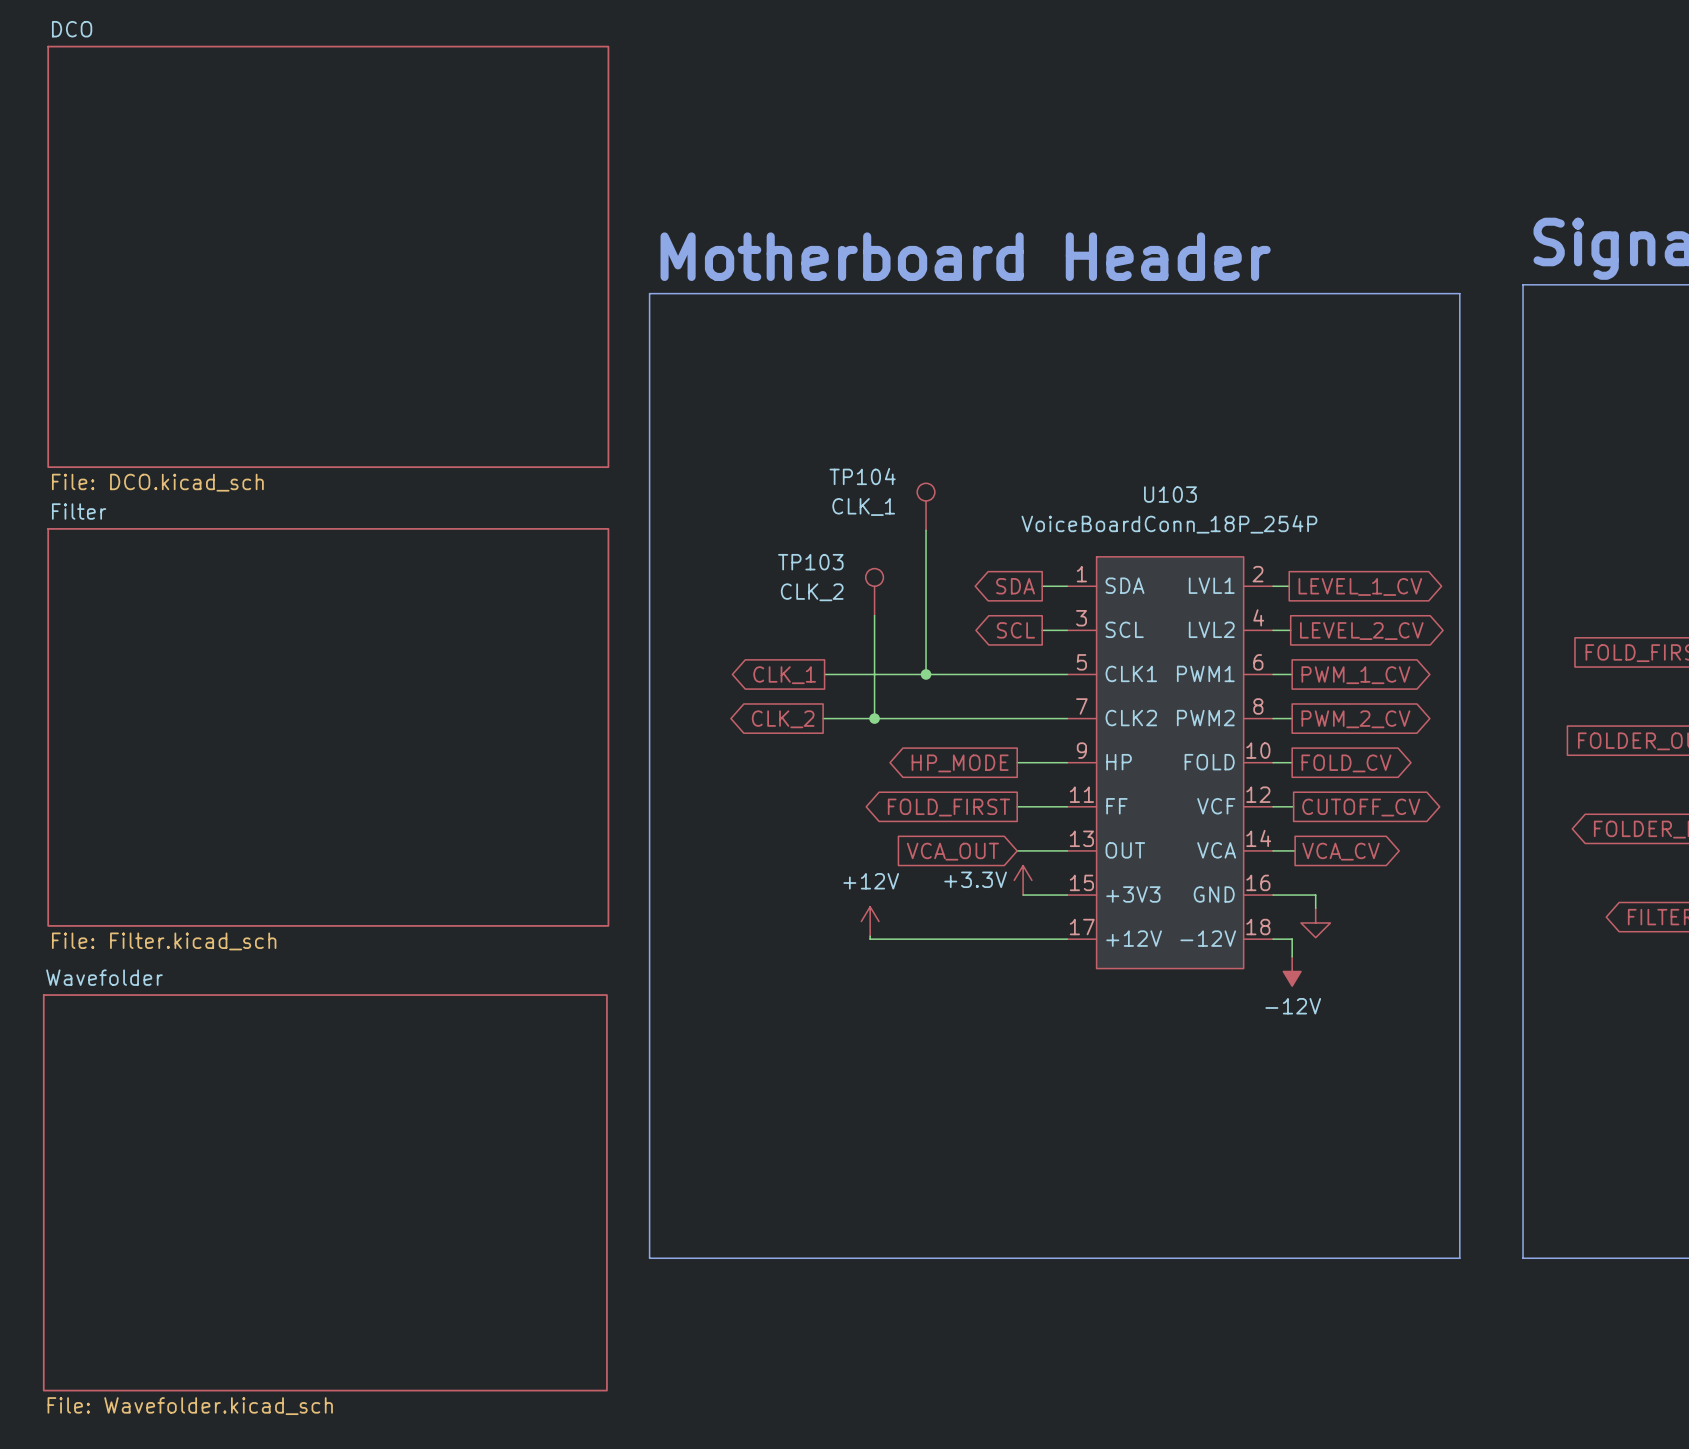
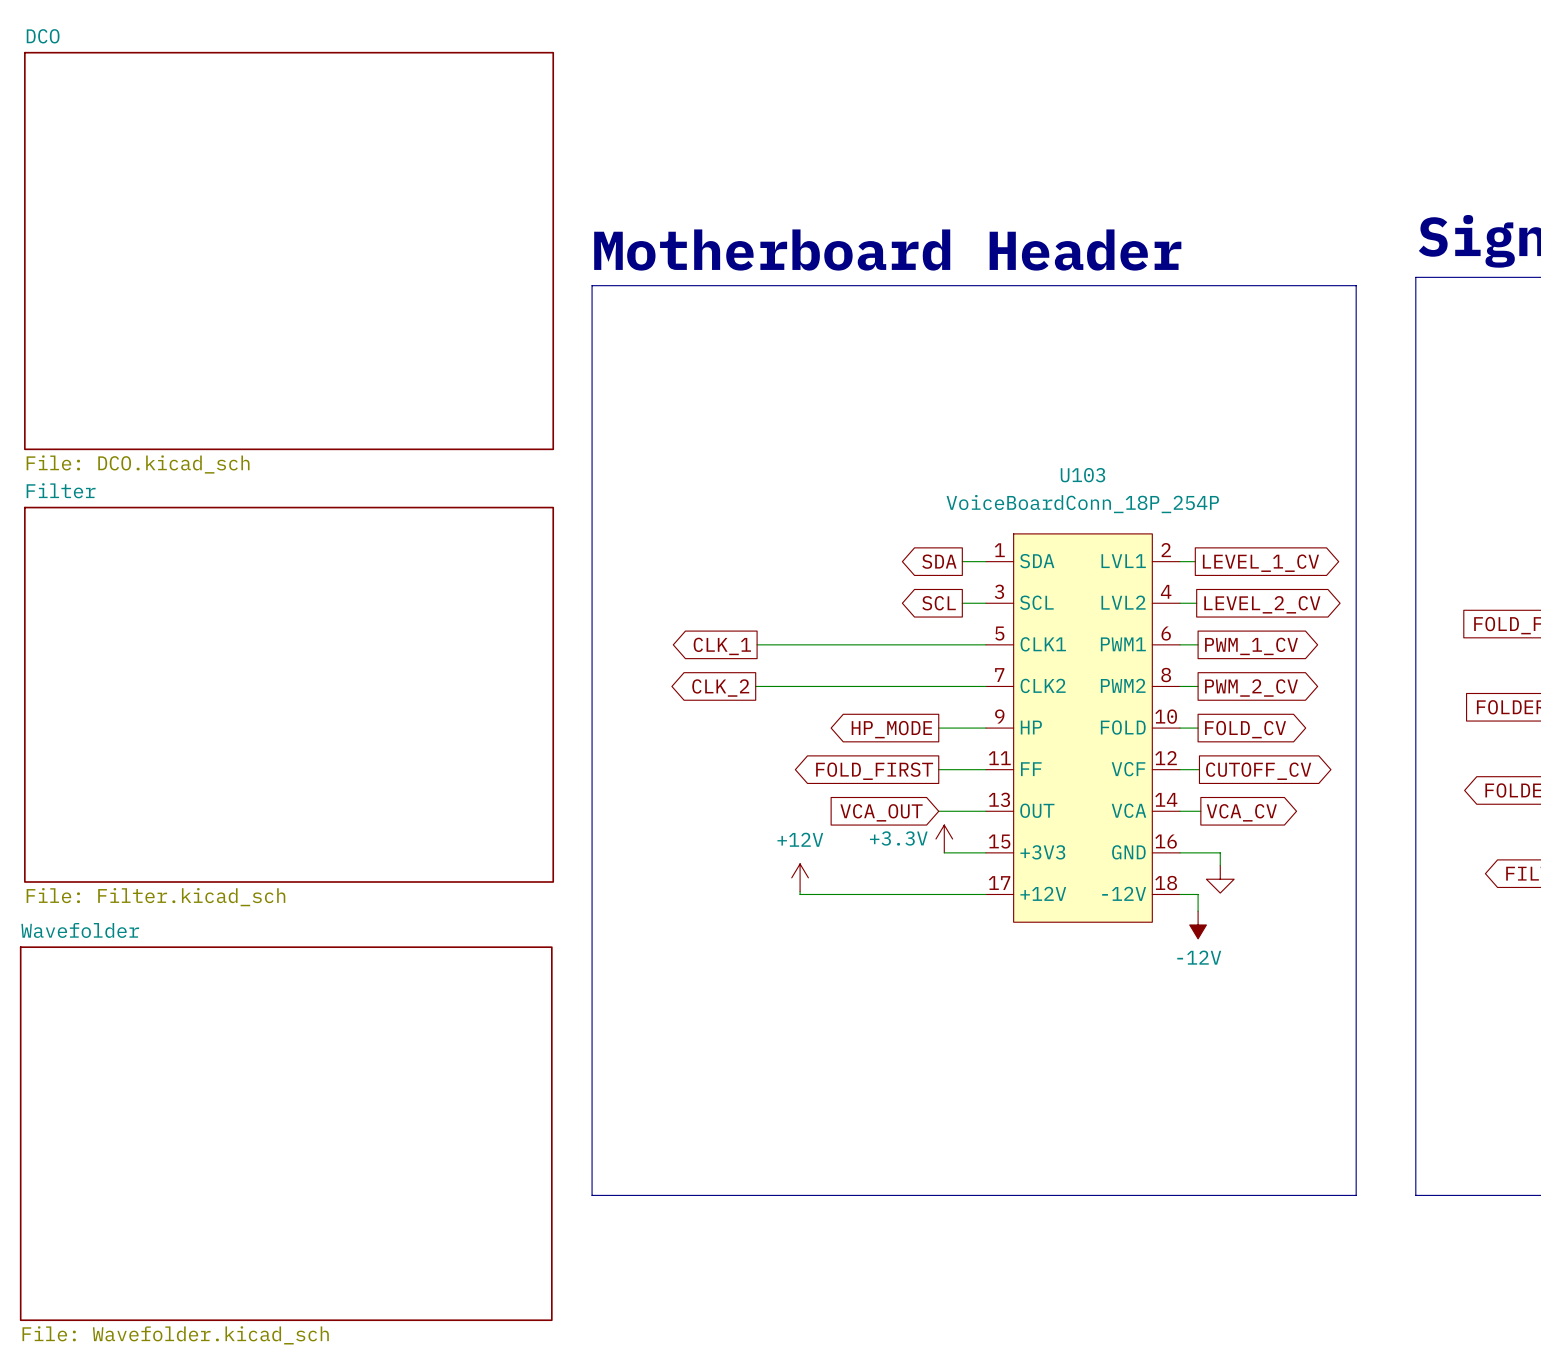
TP104: CLK_1 (926, 506) -> none
wire: (926, 530) (926, 674) -> none
TP103: CLK_2 (874, 592) -> none
wire: (874, 615) (874, 718) -> none
junction: (926, 674) -> none
junction: (874, 718) -> none

